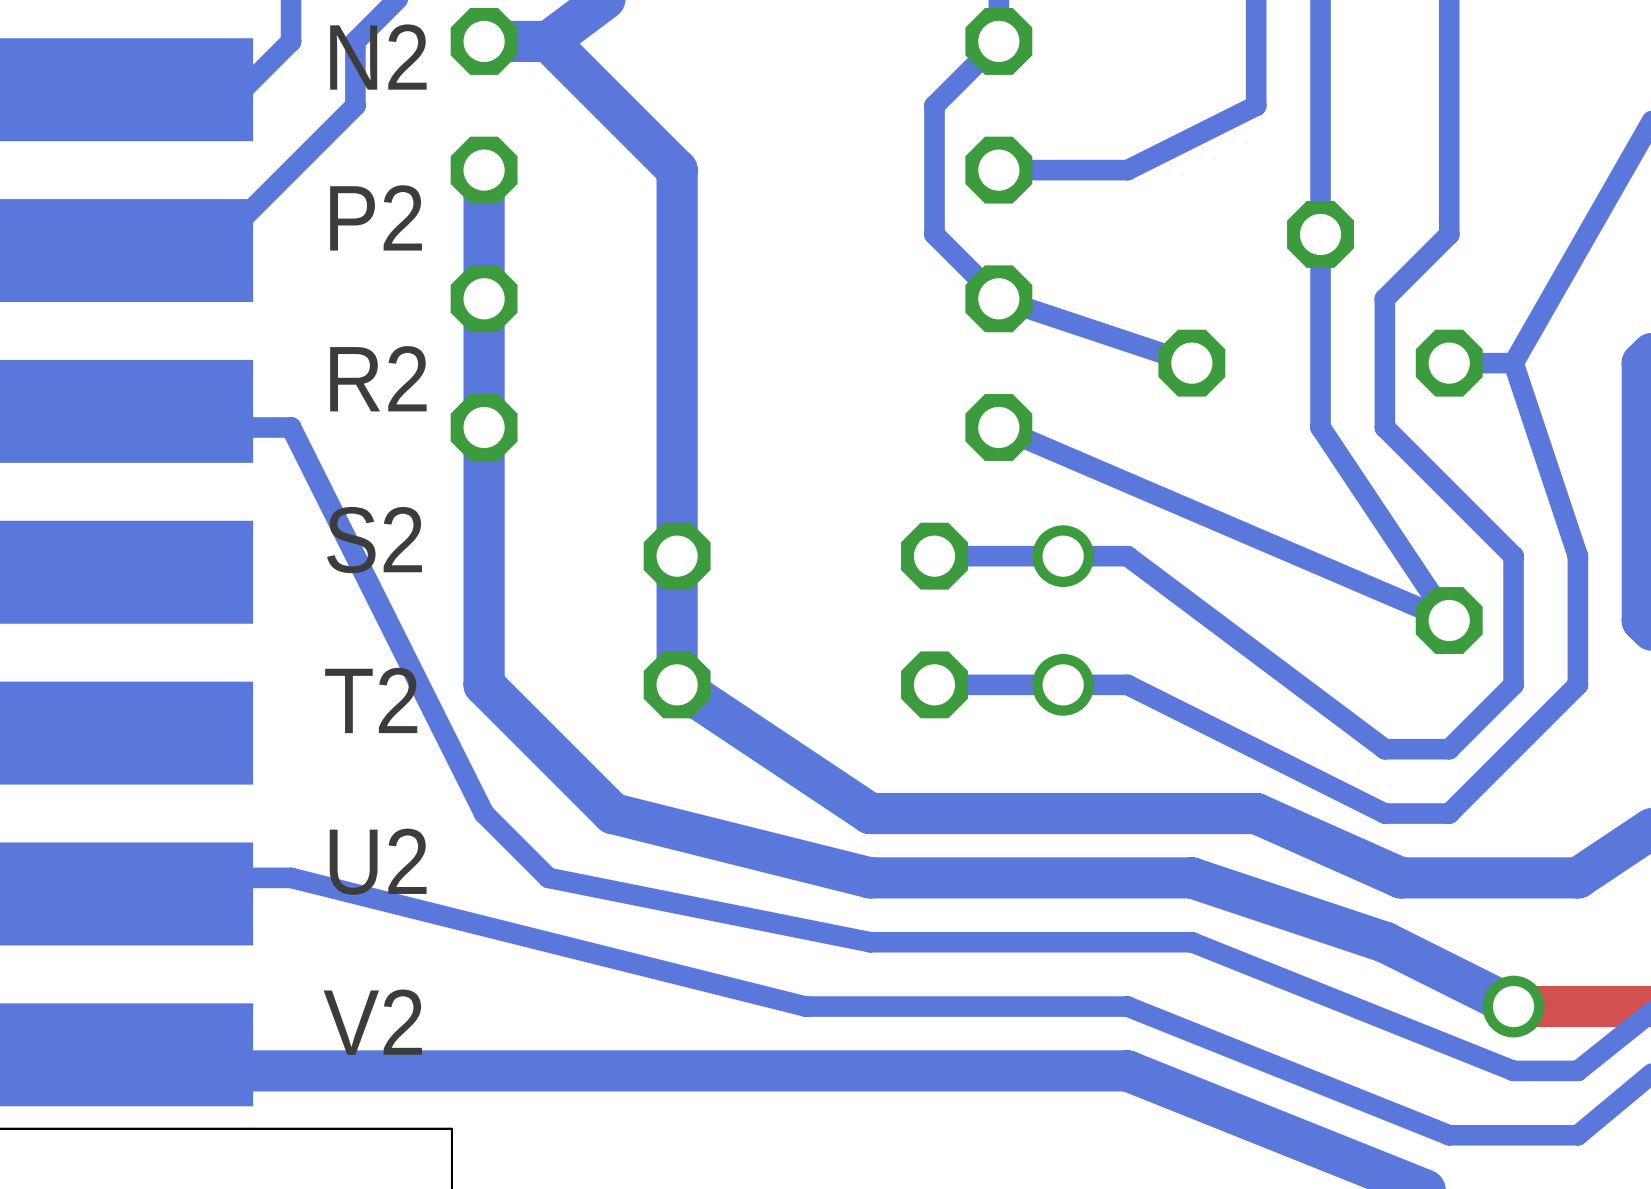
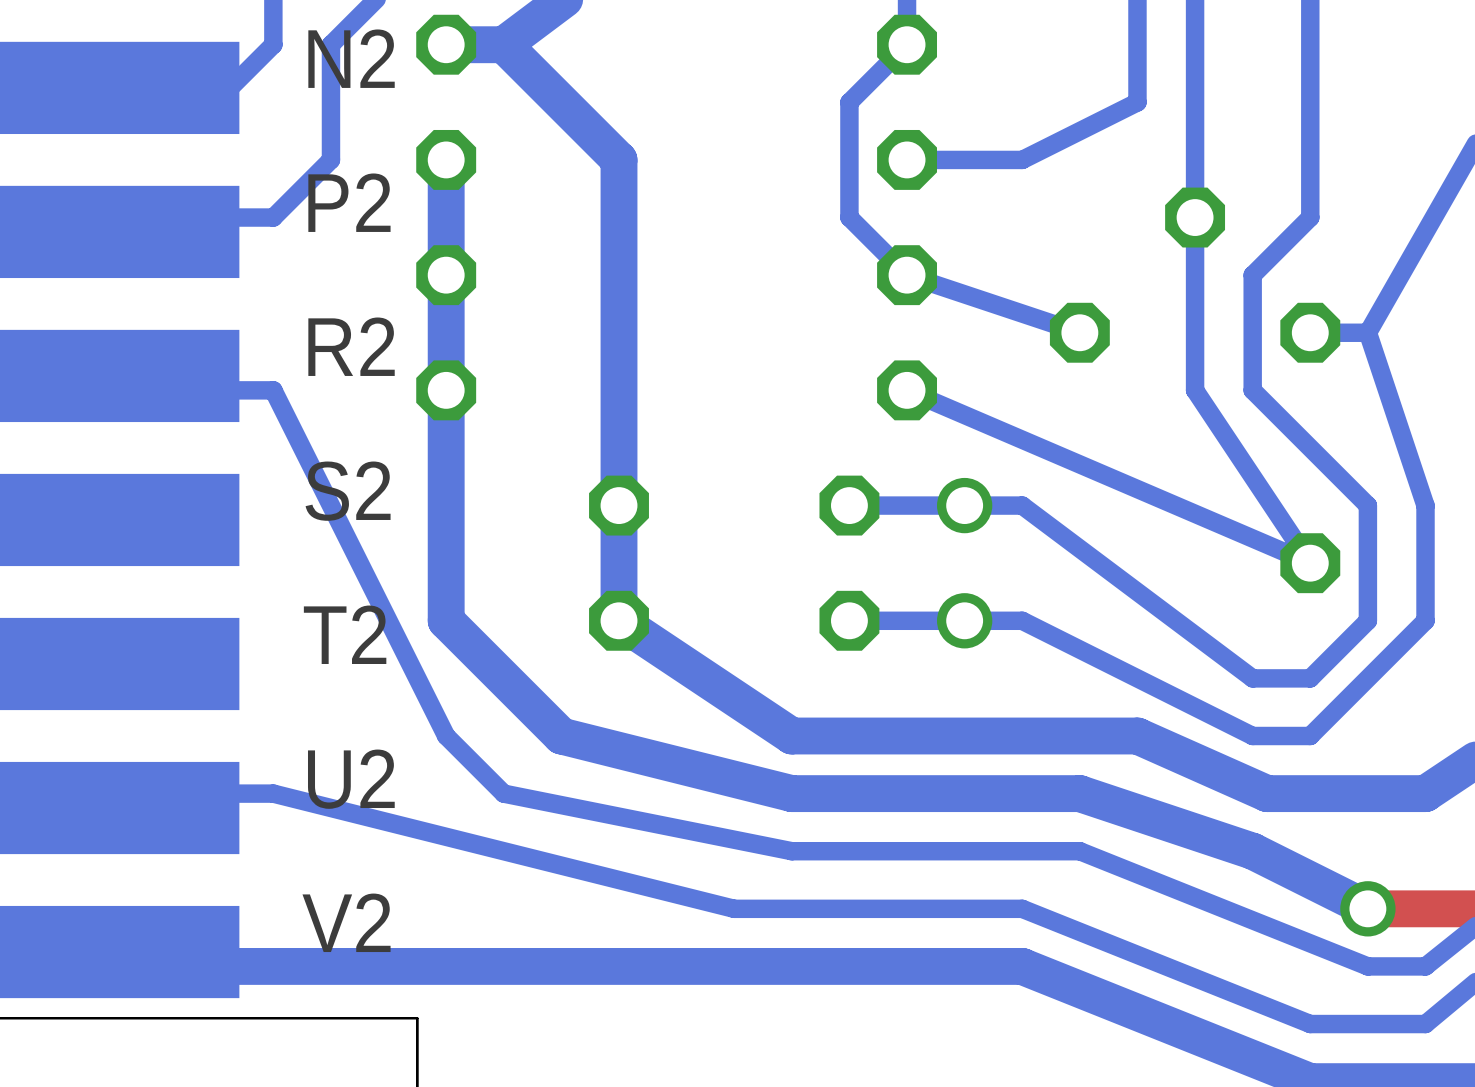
bottom track: (355, 105) (226, 234) -> (330, 102) (330, 159) (273, 217) (215, 217)

